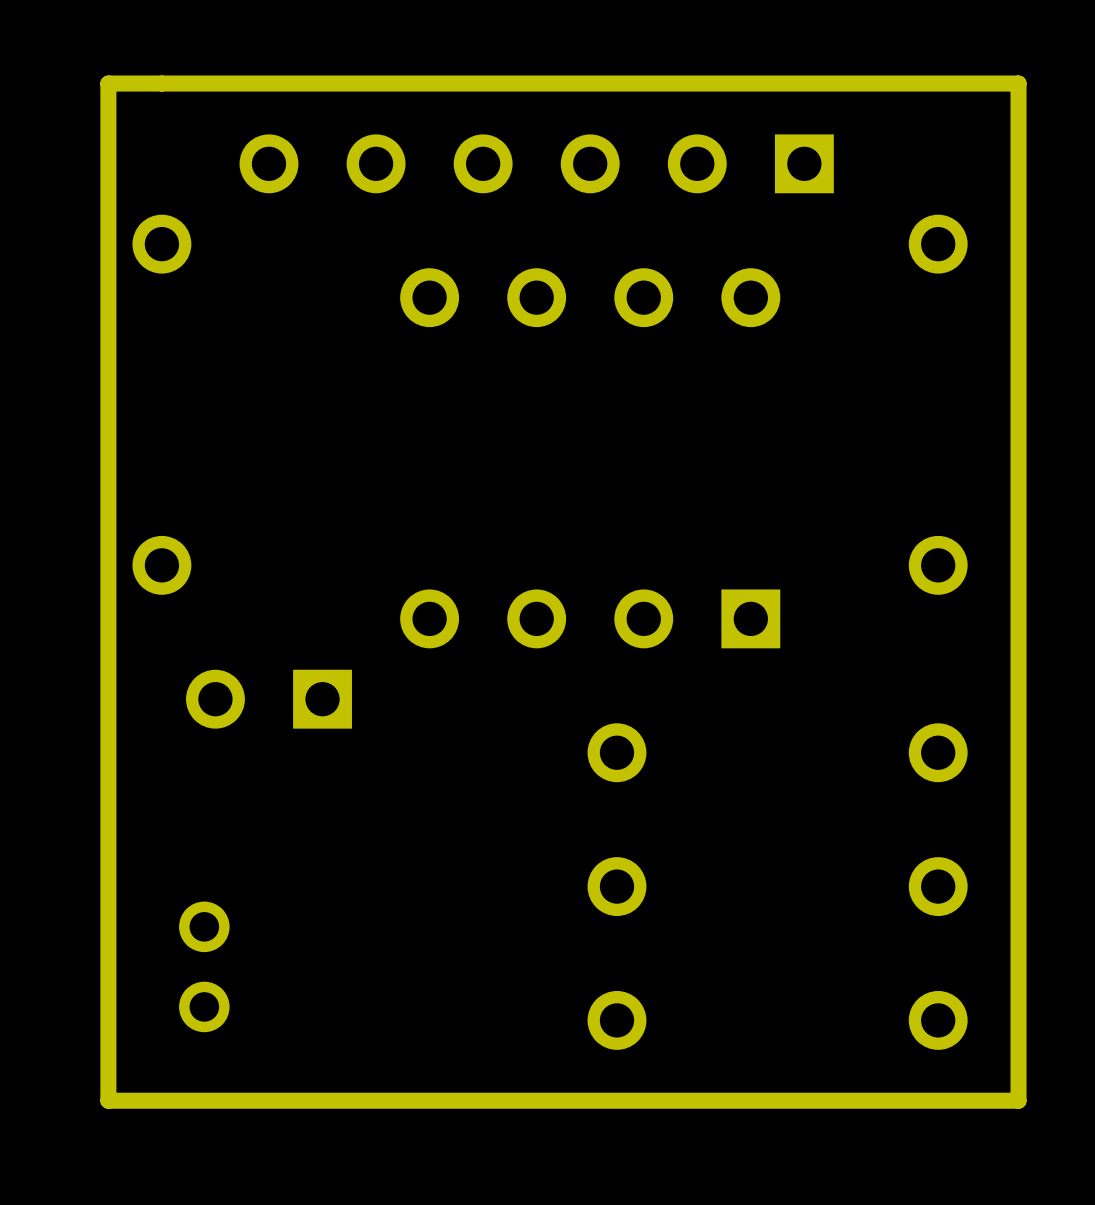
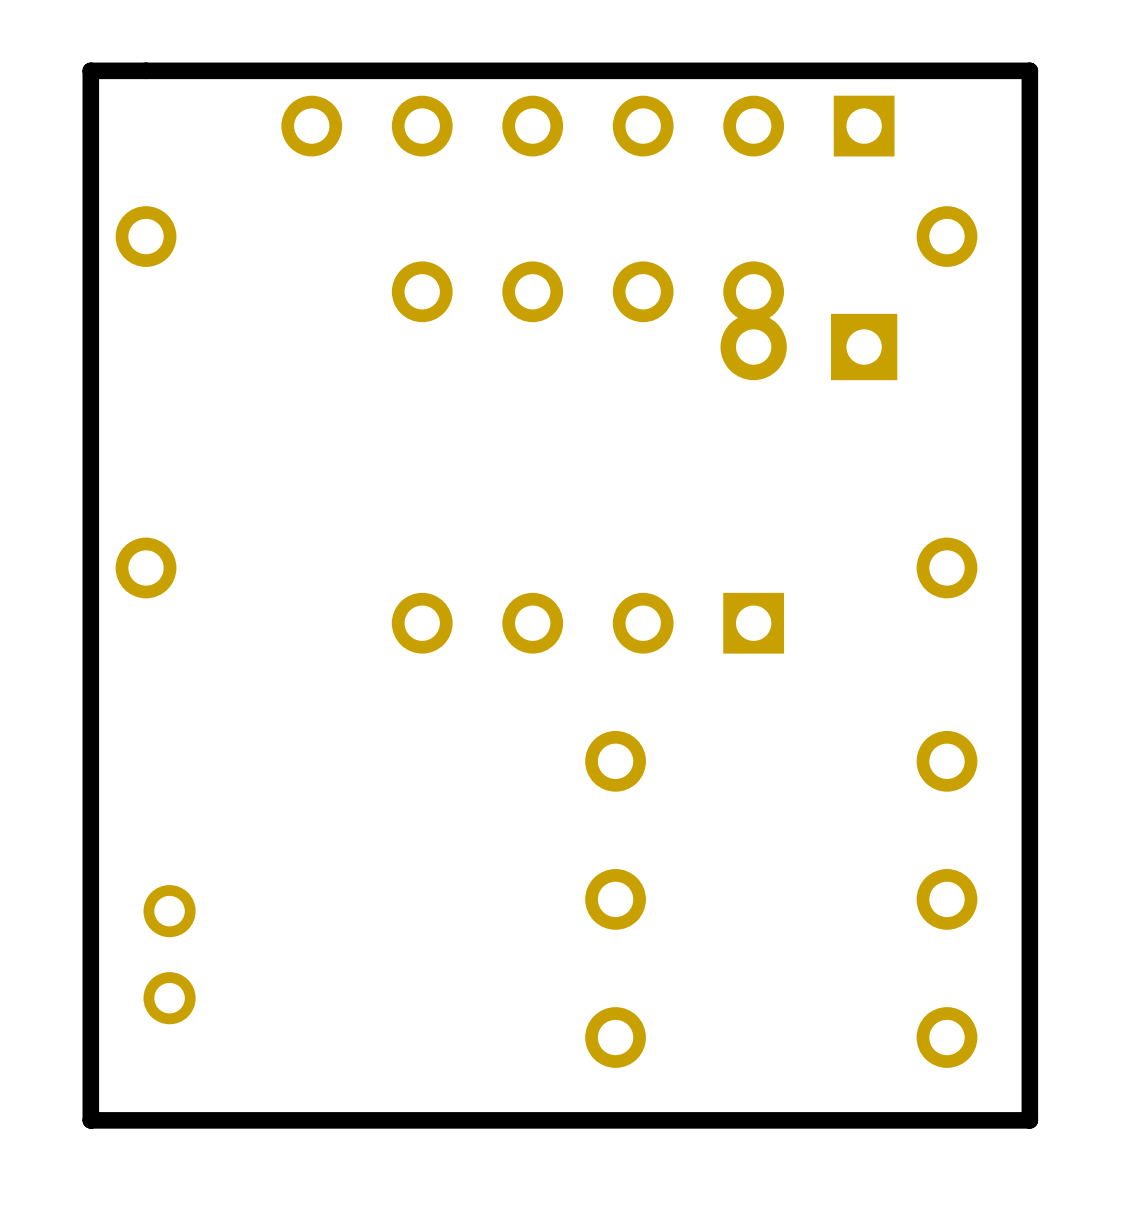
part position: (536, 163) -> (587, 126)
part: none -> (808, 347)
part: (269, 699) -> none
part footprint: [179, 901, 230, 1033] -> [143, 885, 196, 1025]

